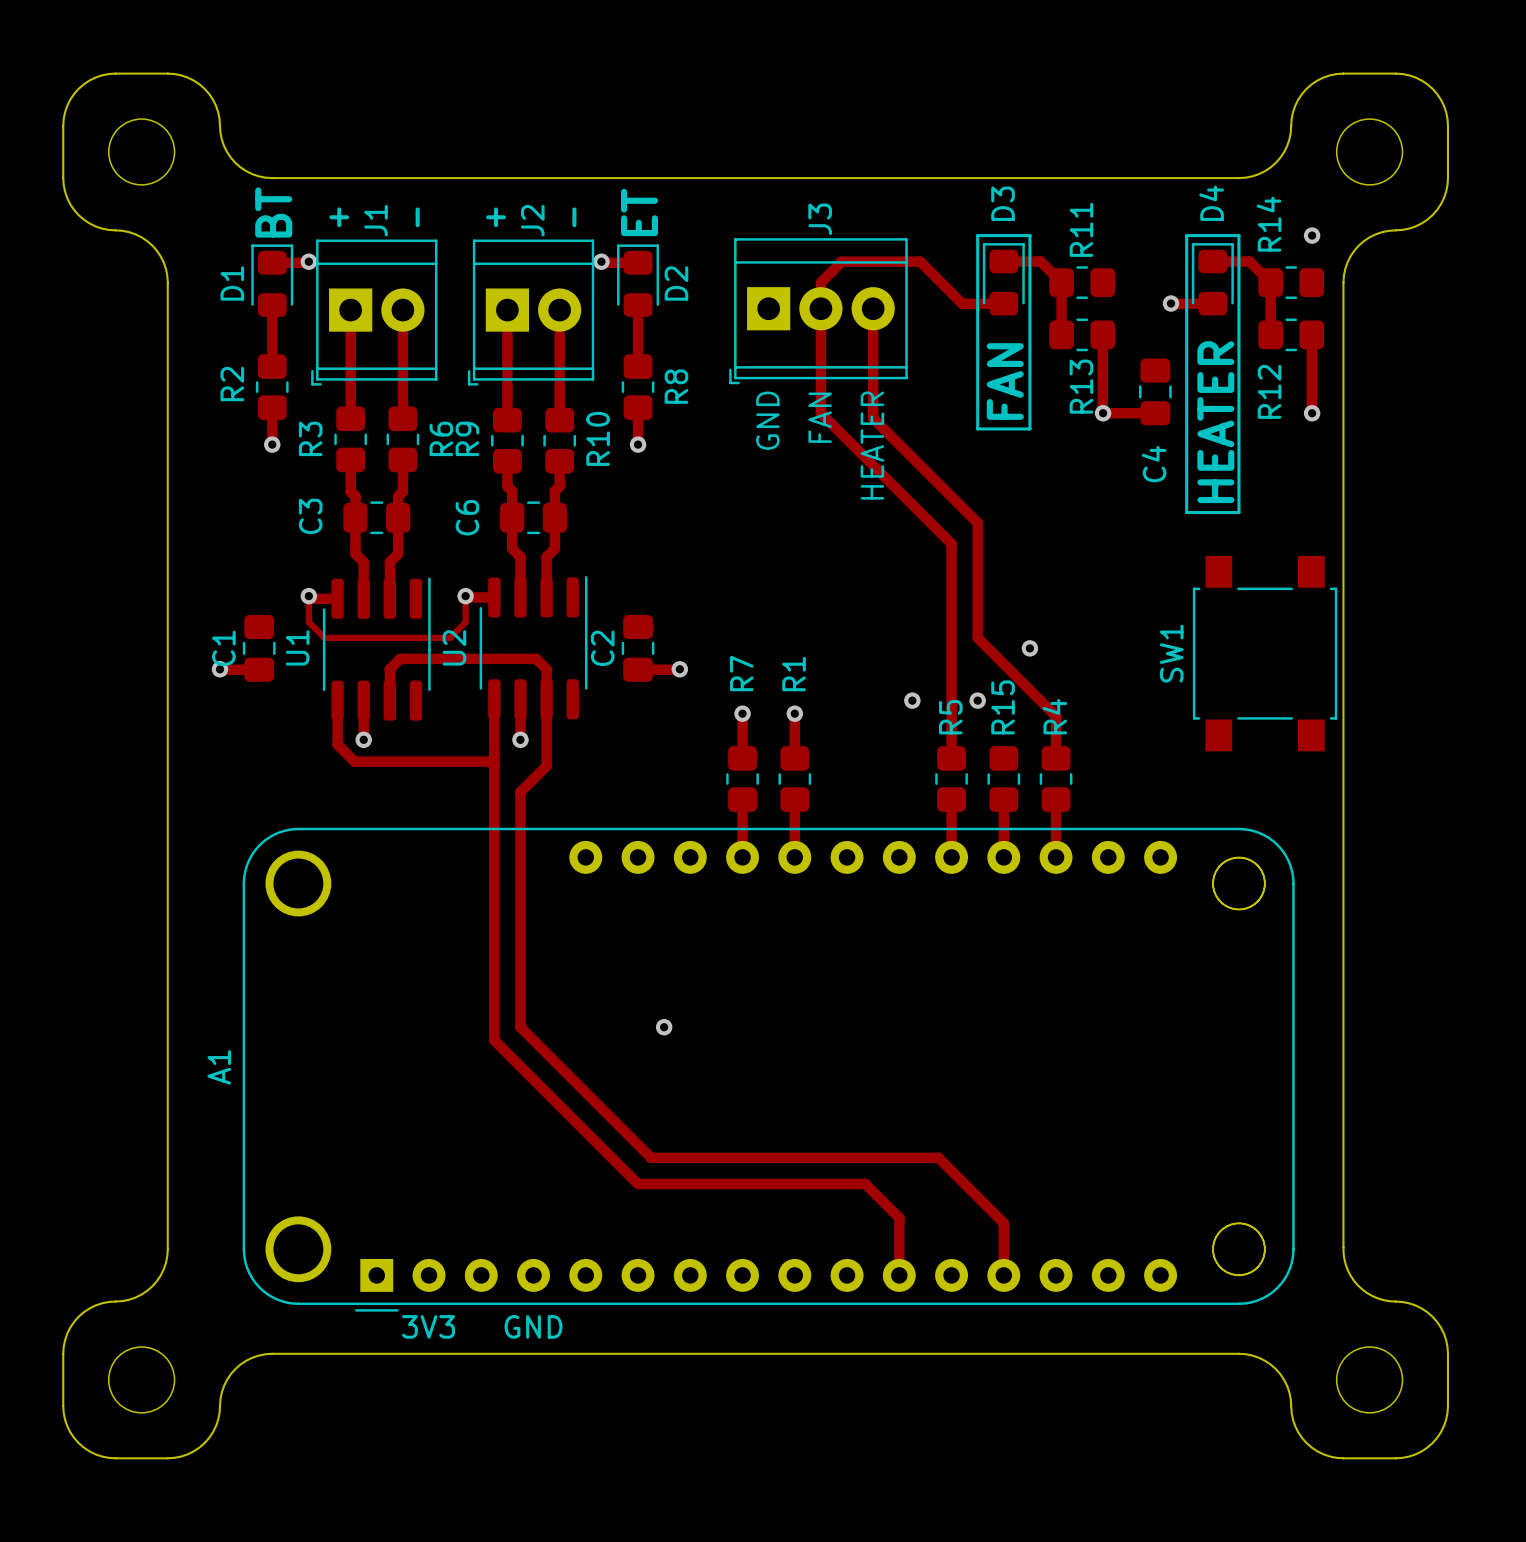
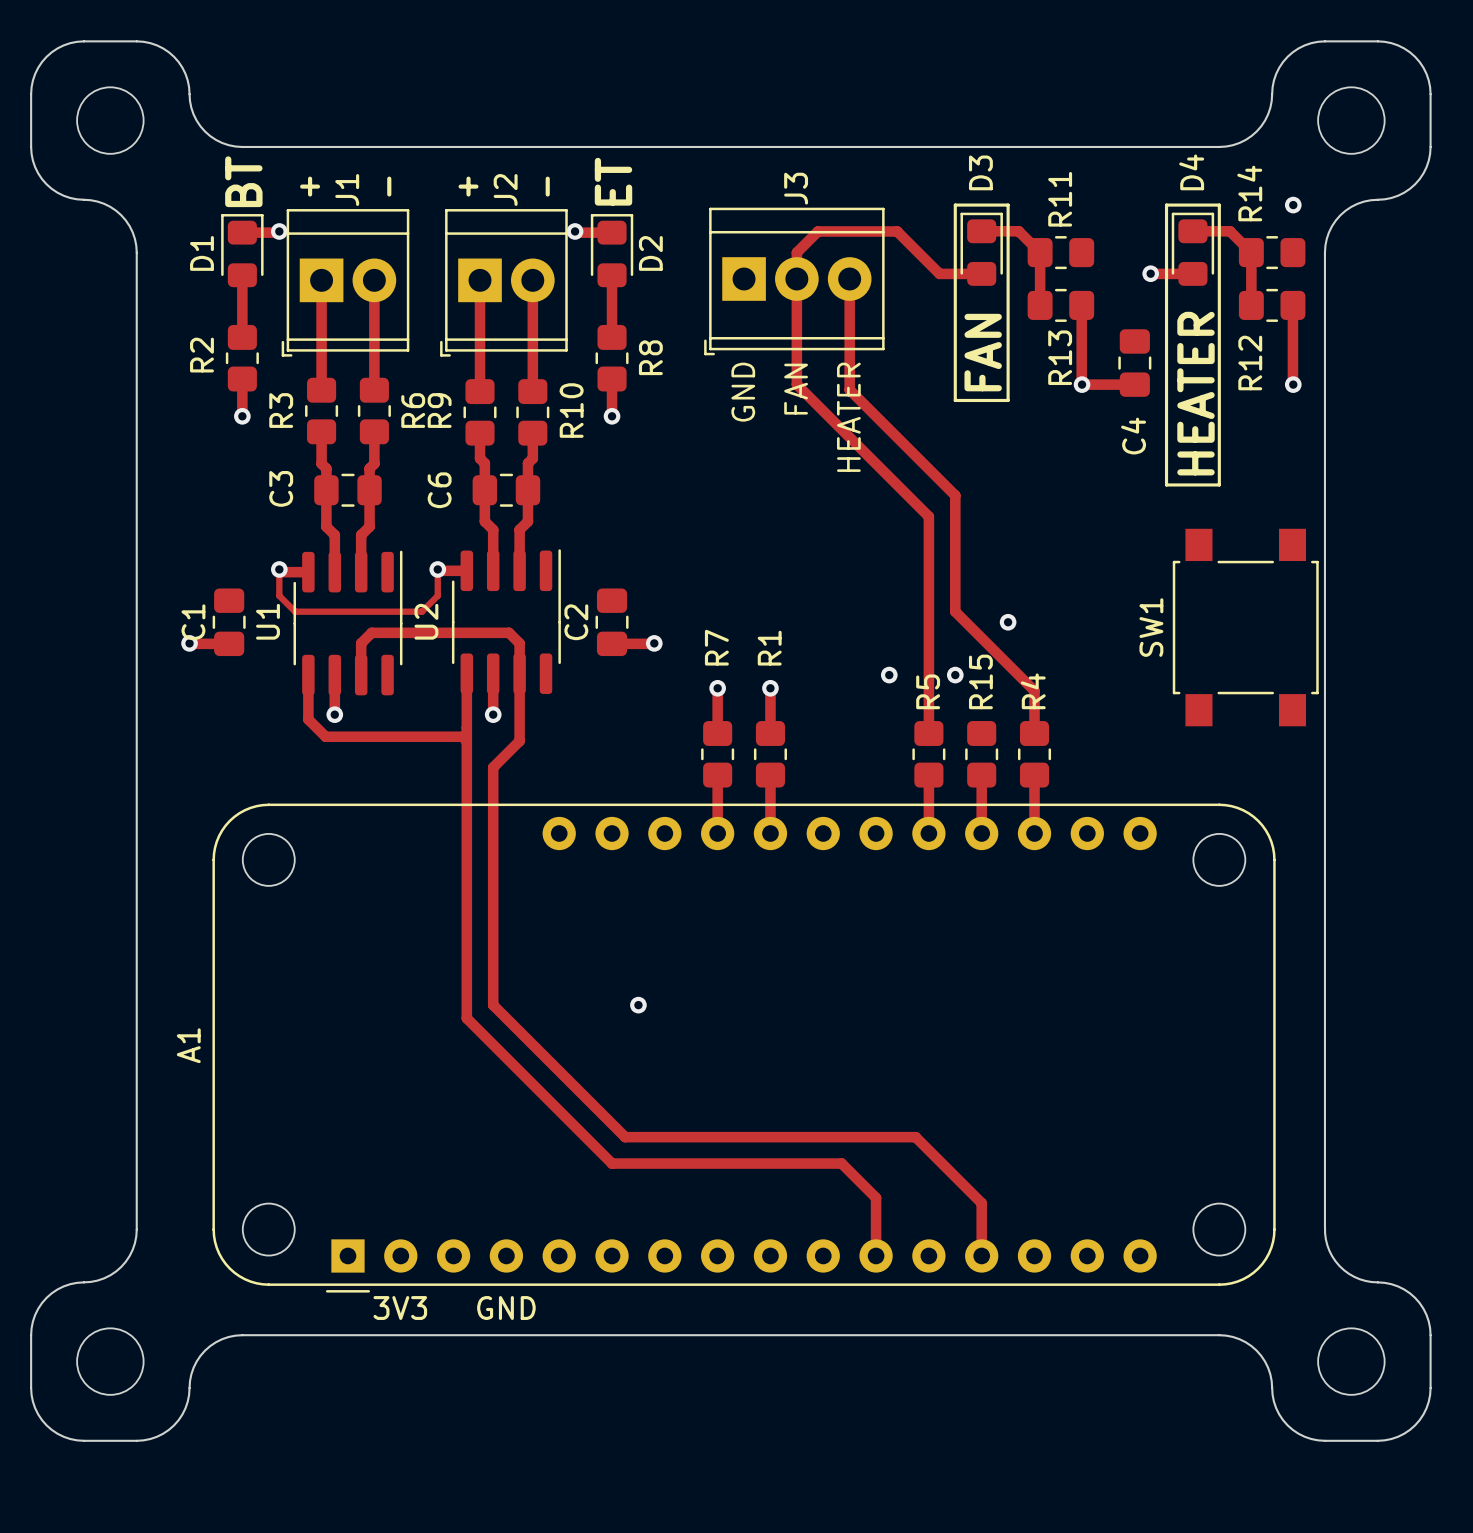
A1 footprint: [242, 827, 1295, 1312] -> [212, 803, 1276, 1293]

